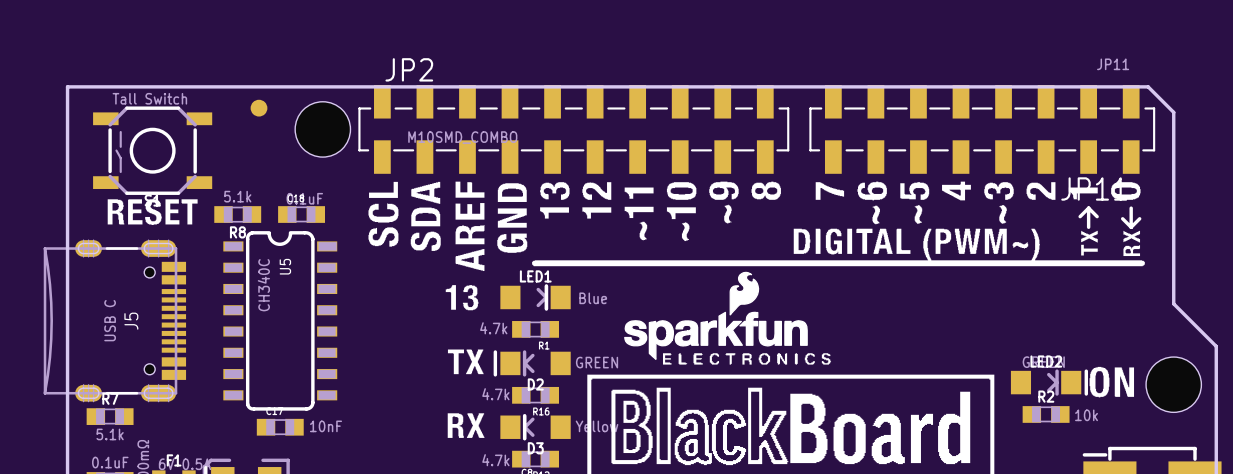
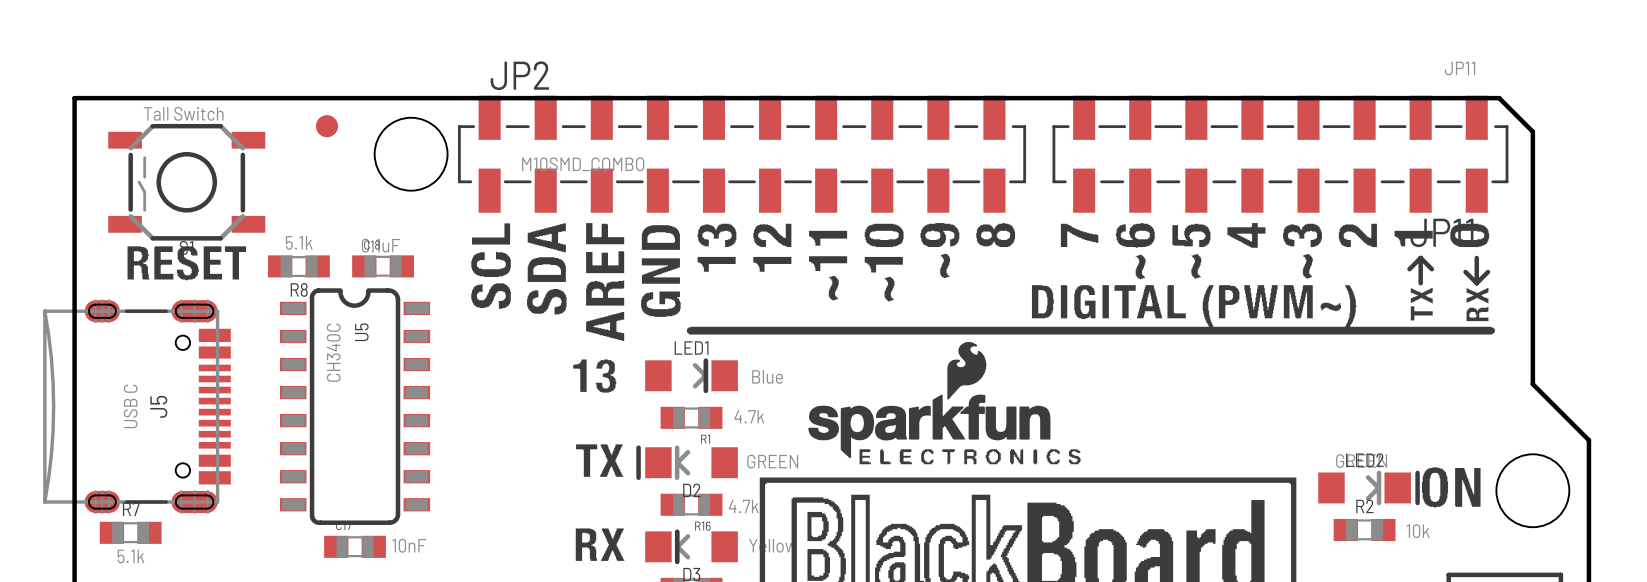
R1 value position: 4.7k (493, 328) -> 4.7k (749, 416)
R16 value position: 4.7k (495, 394) -> 4.7k (743, 506)

